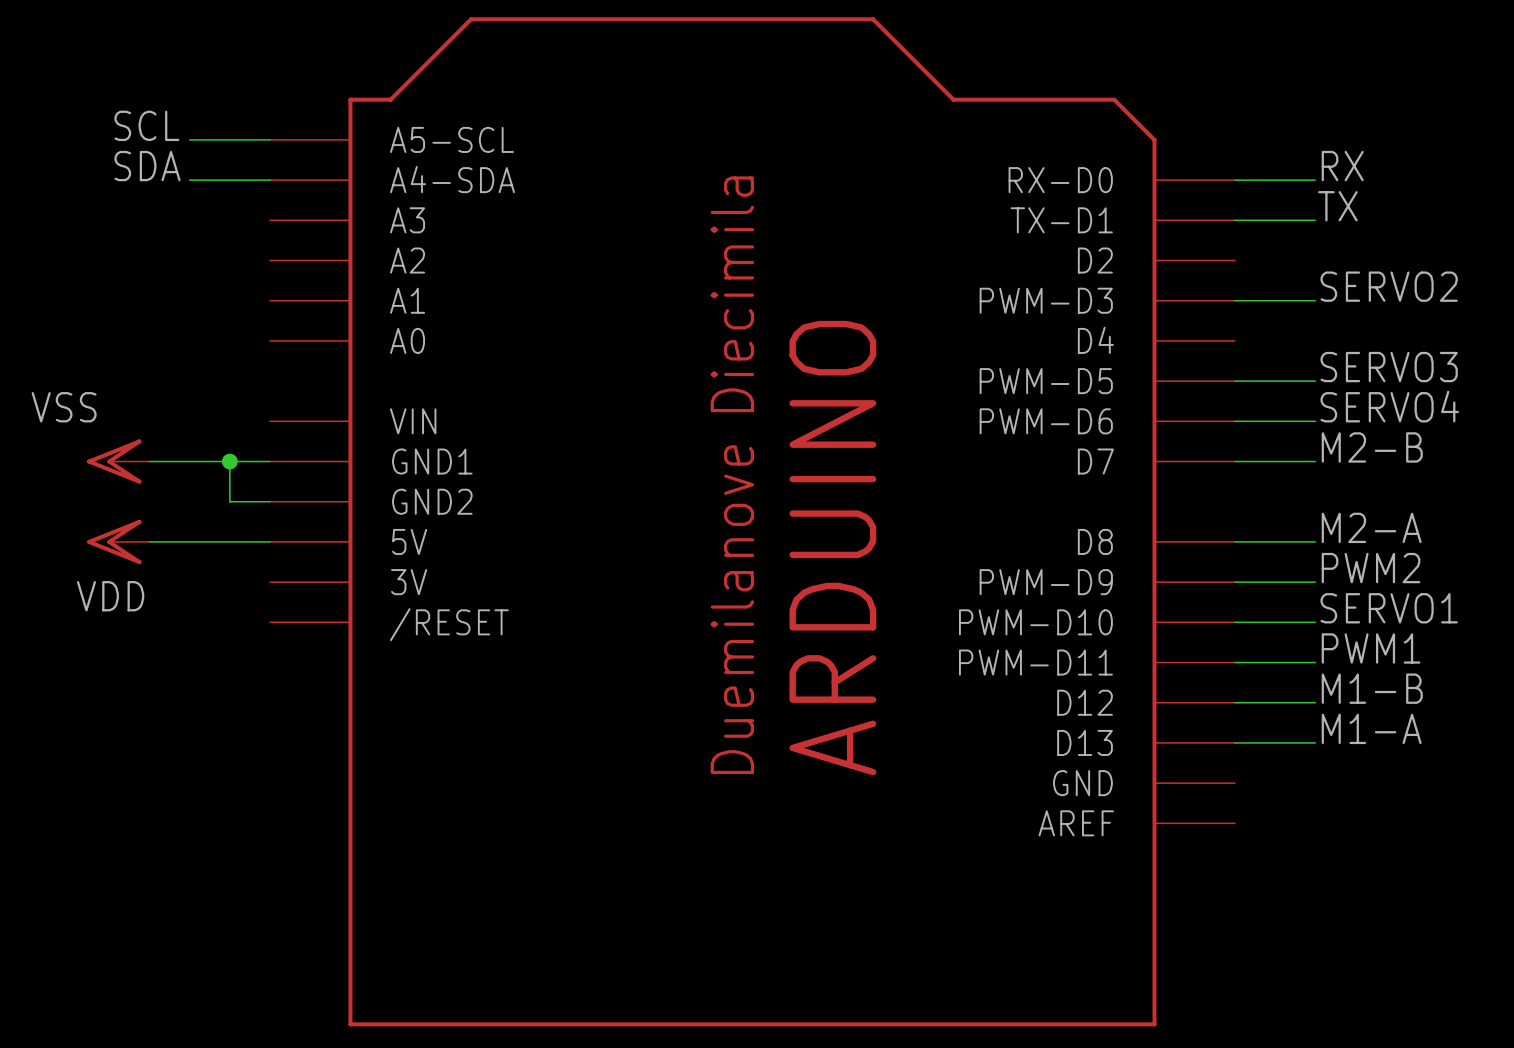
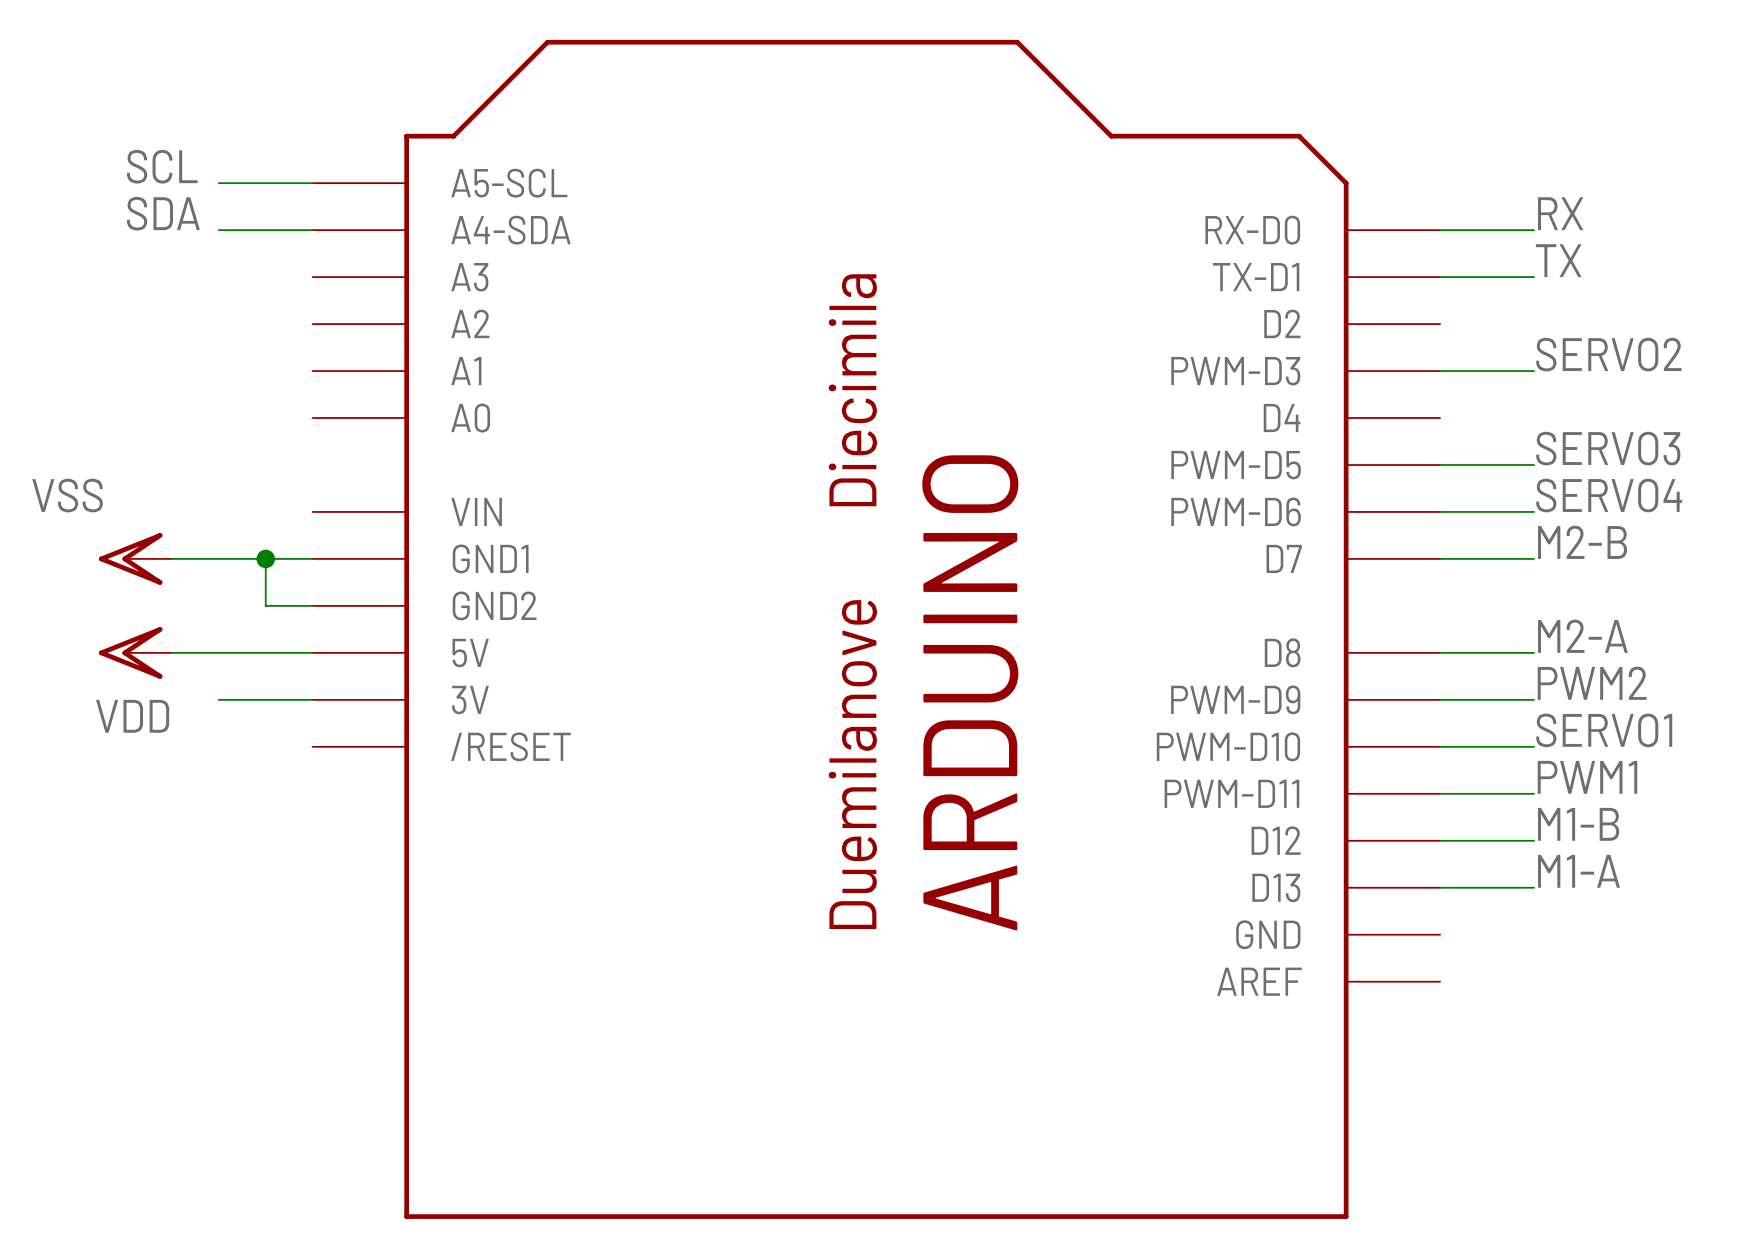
wire: none -> (218, 699) (312, 699)

